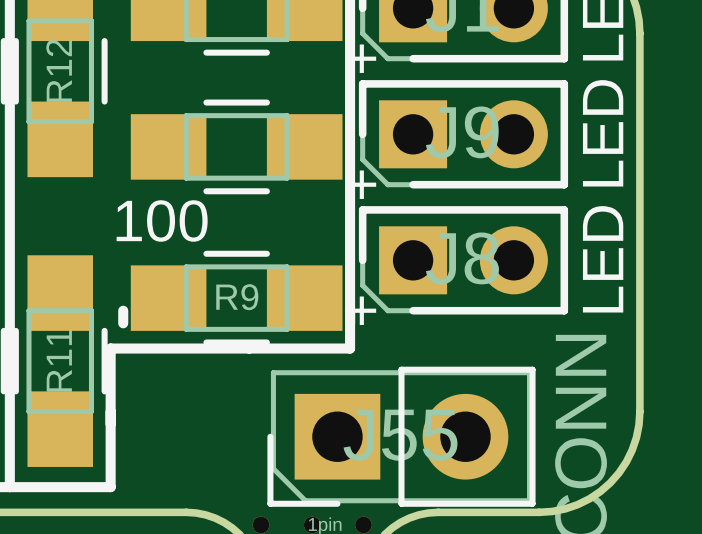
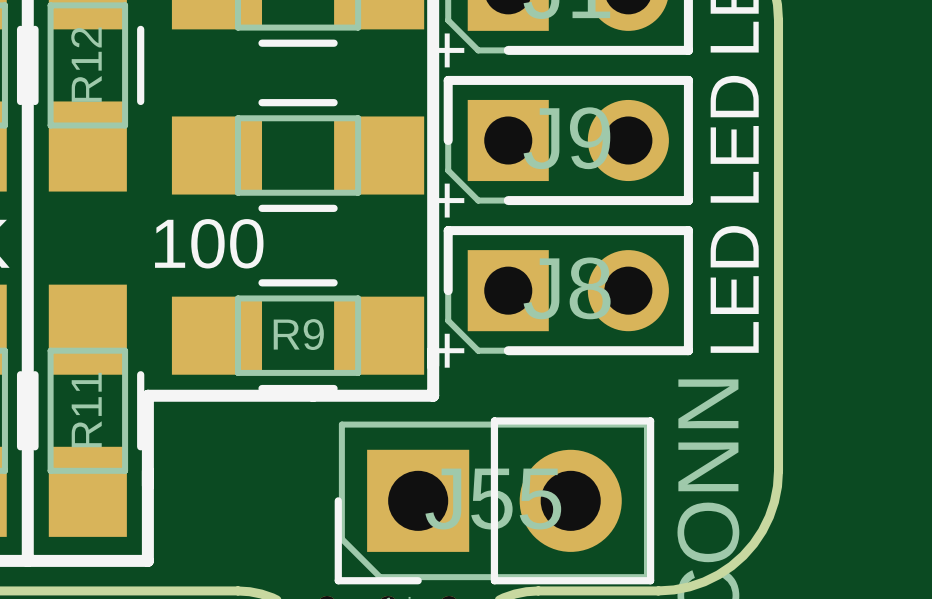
line: (123, 310) (123, 323) -> none

